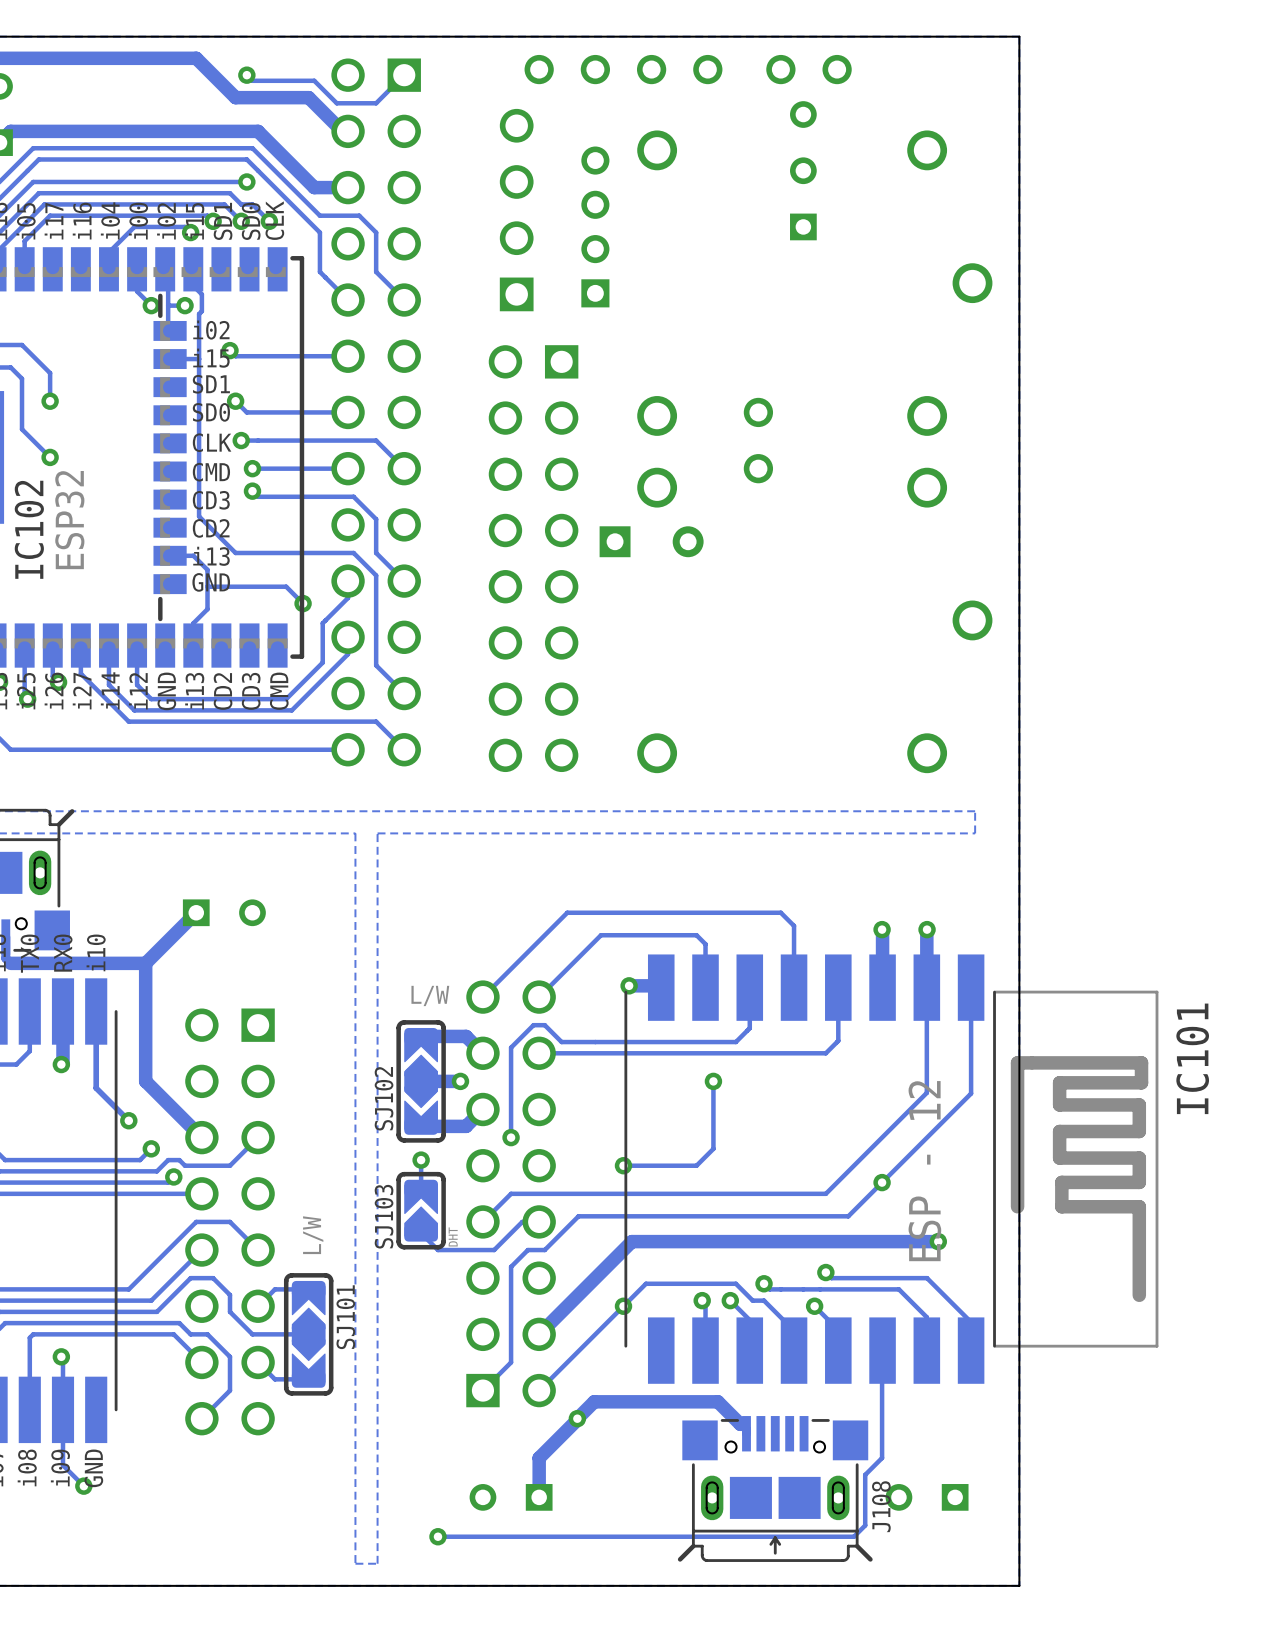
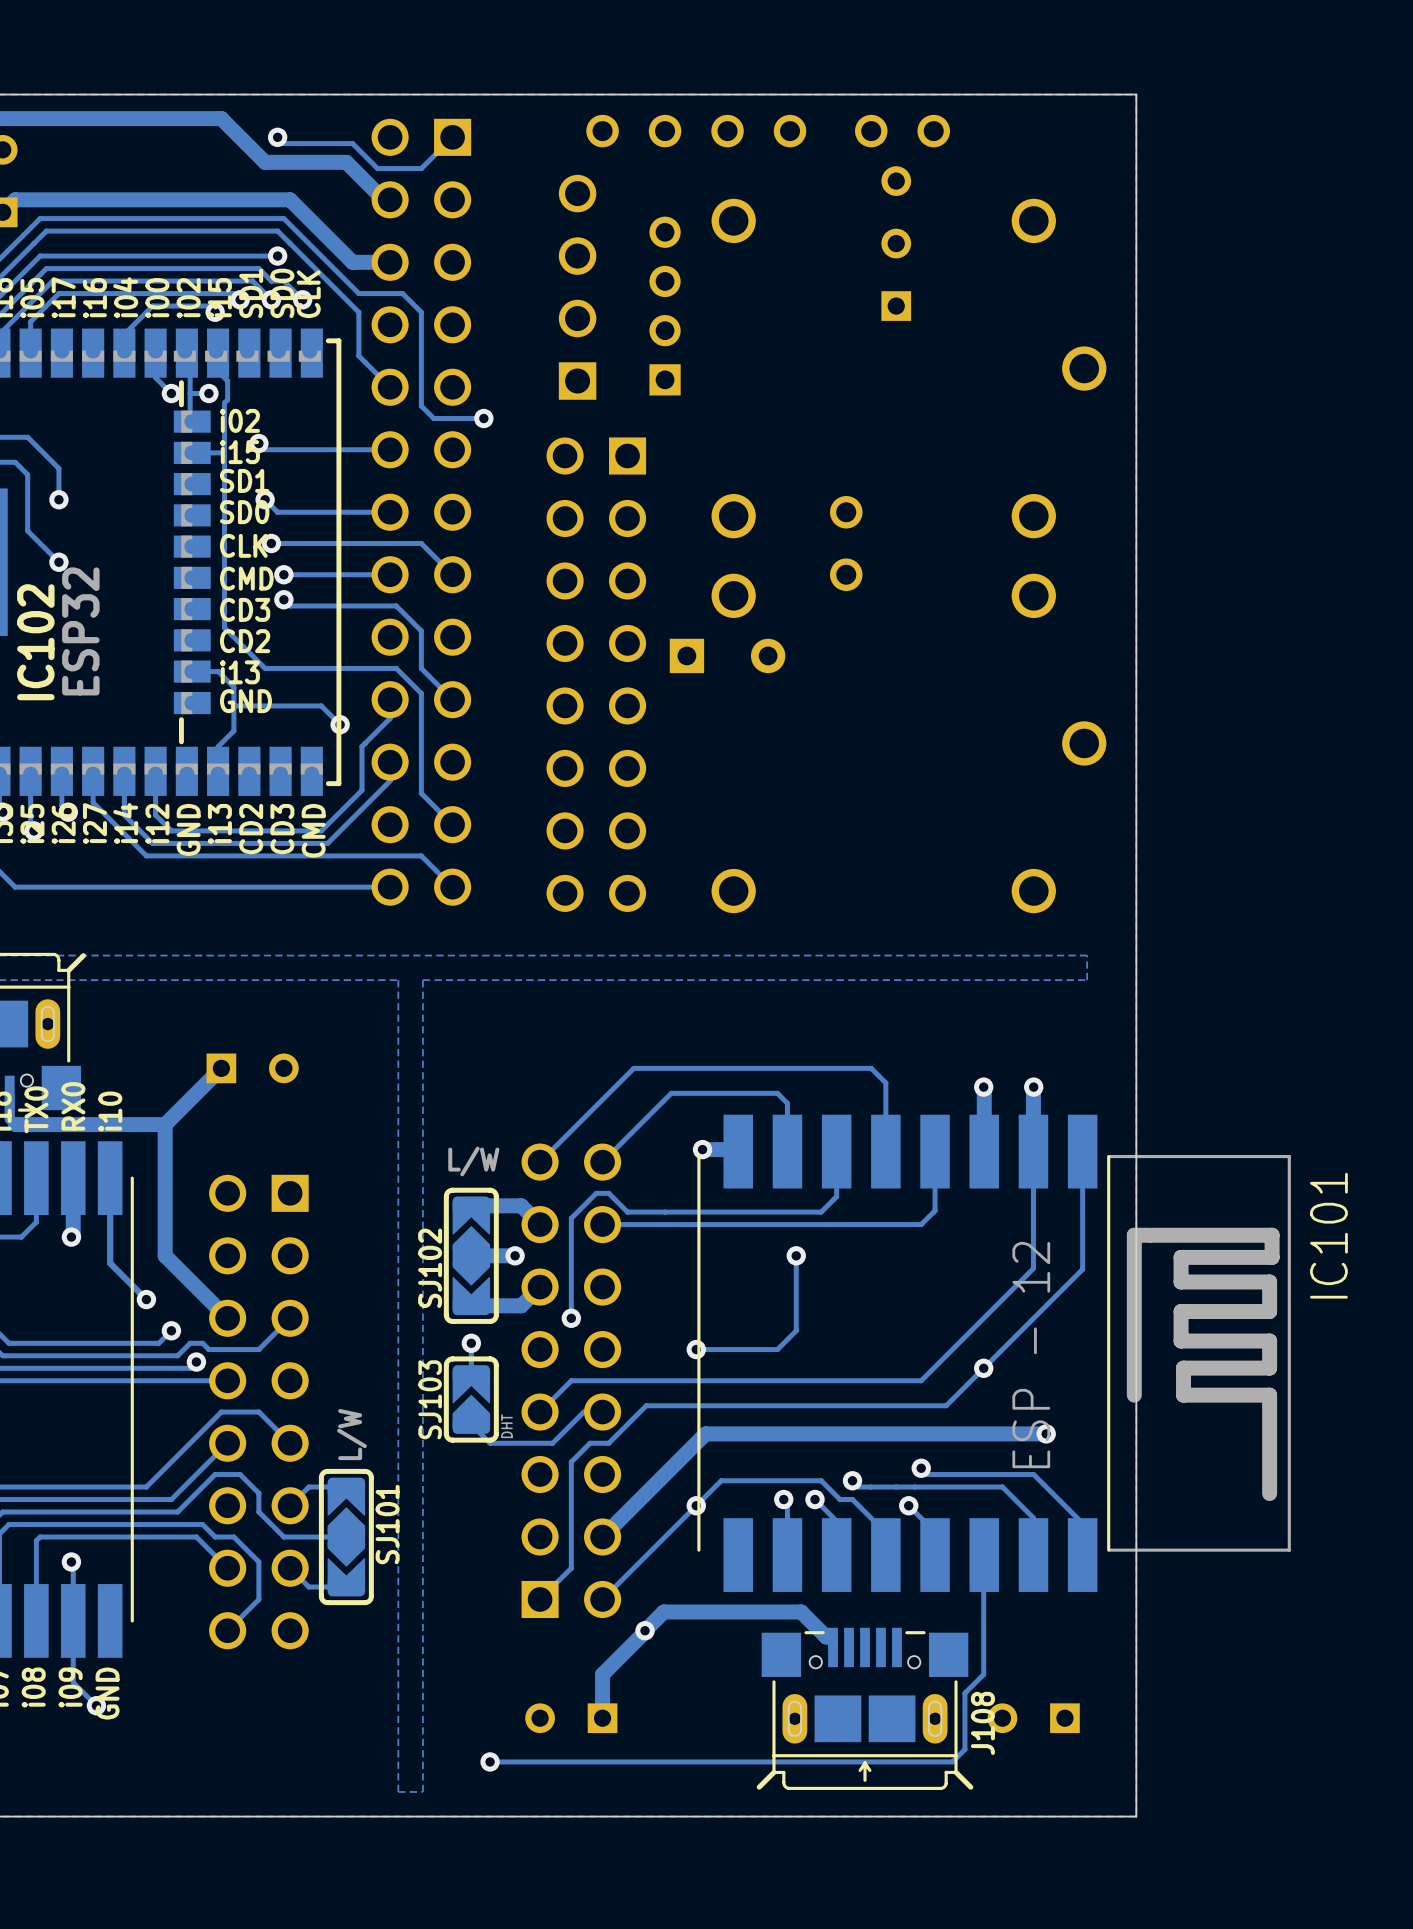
track: (376, 271) (404, 300) -> (421, 356) (421, 406) (433, 418) (483, 418)
via: none -> (483, 418)

